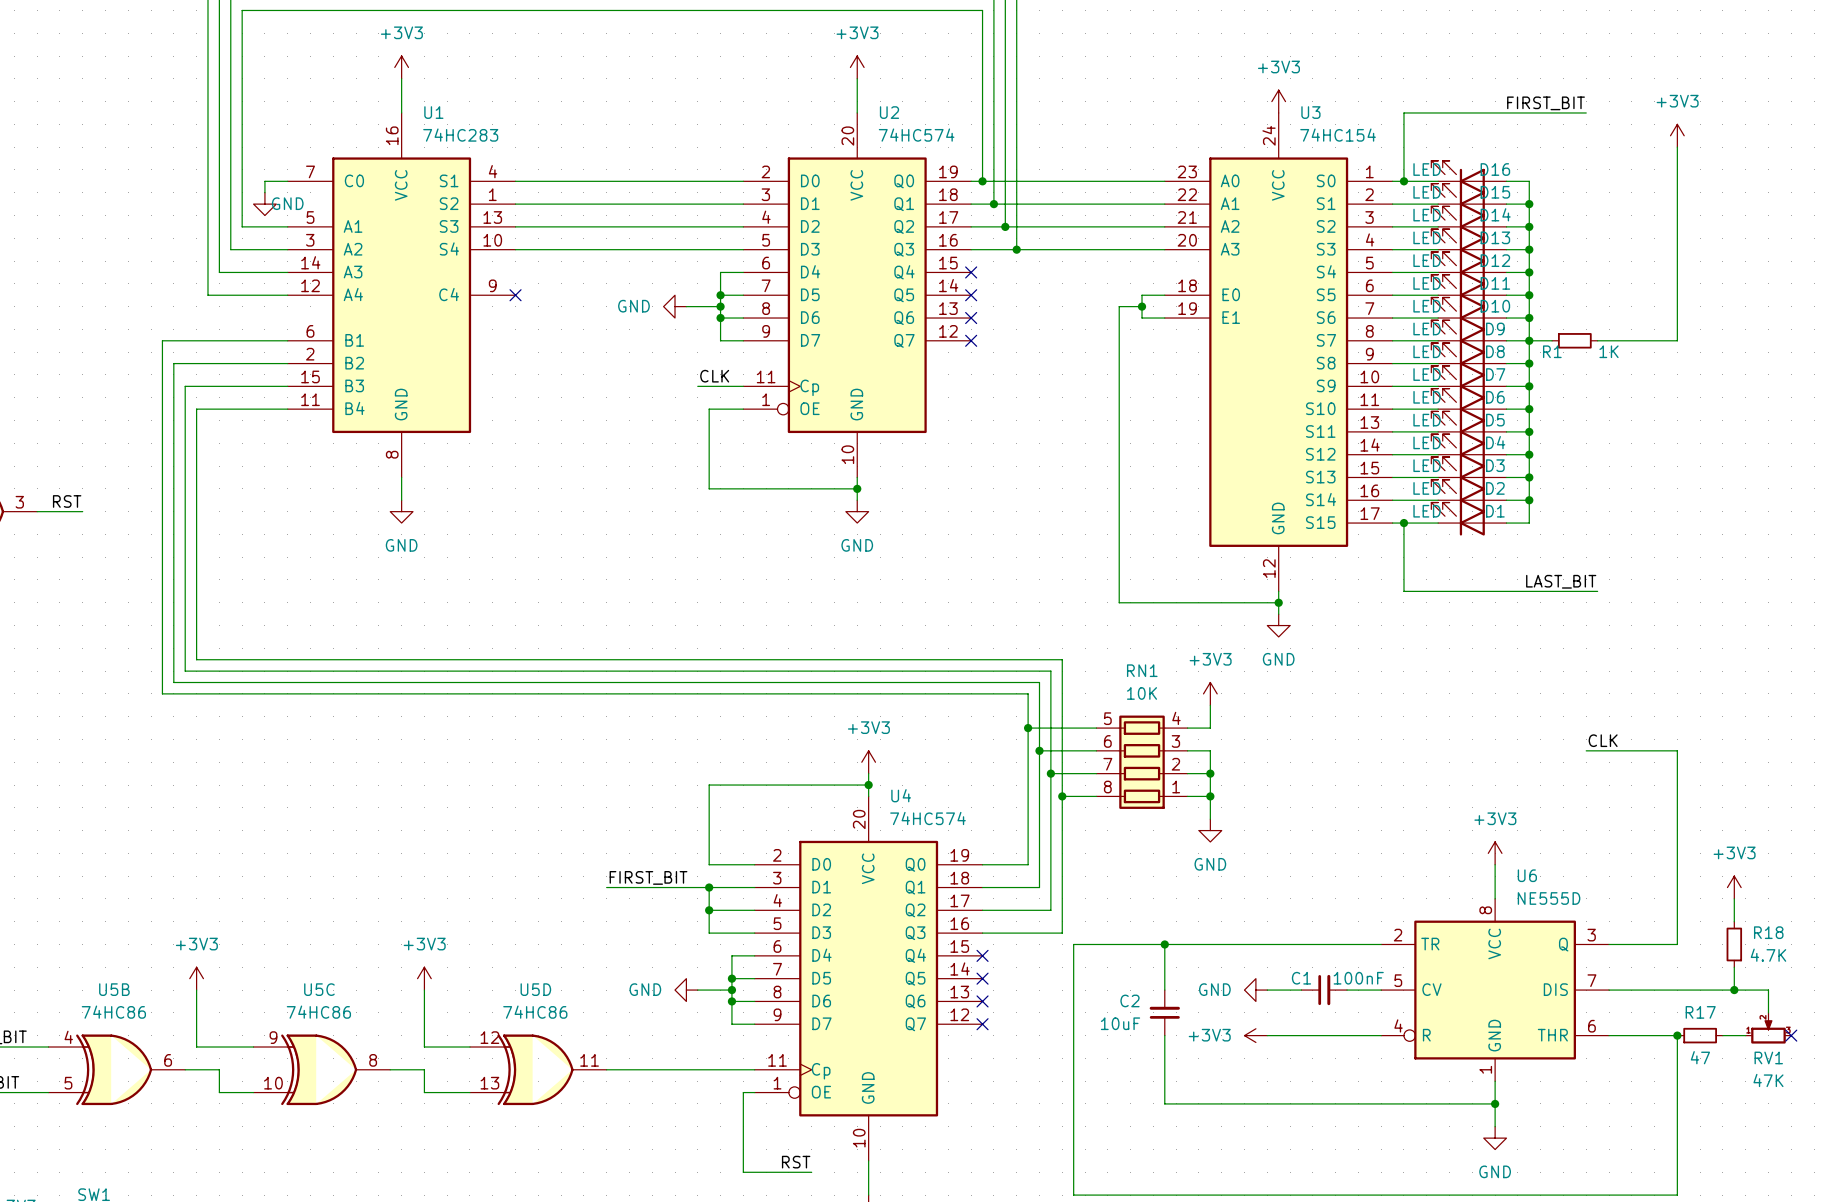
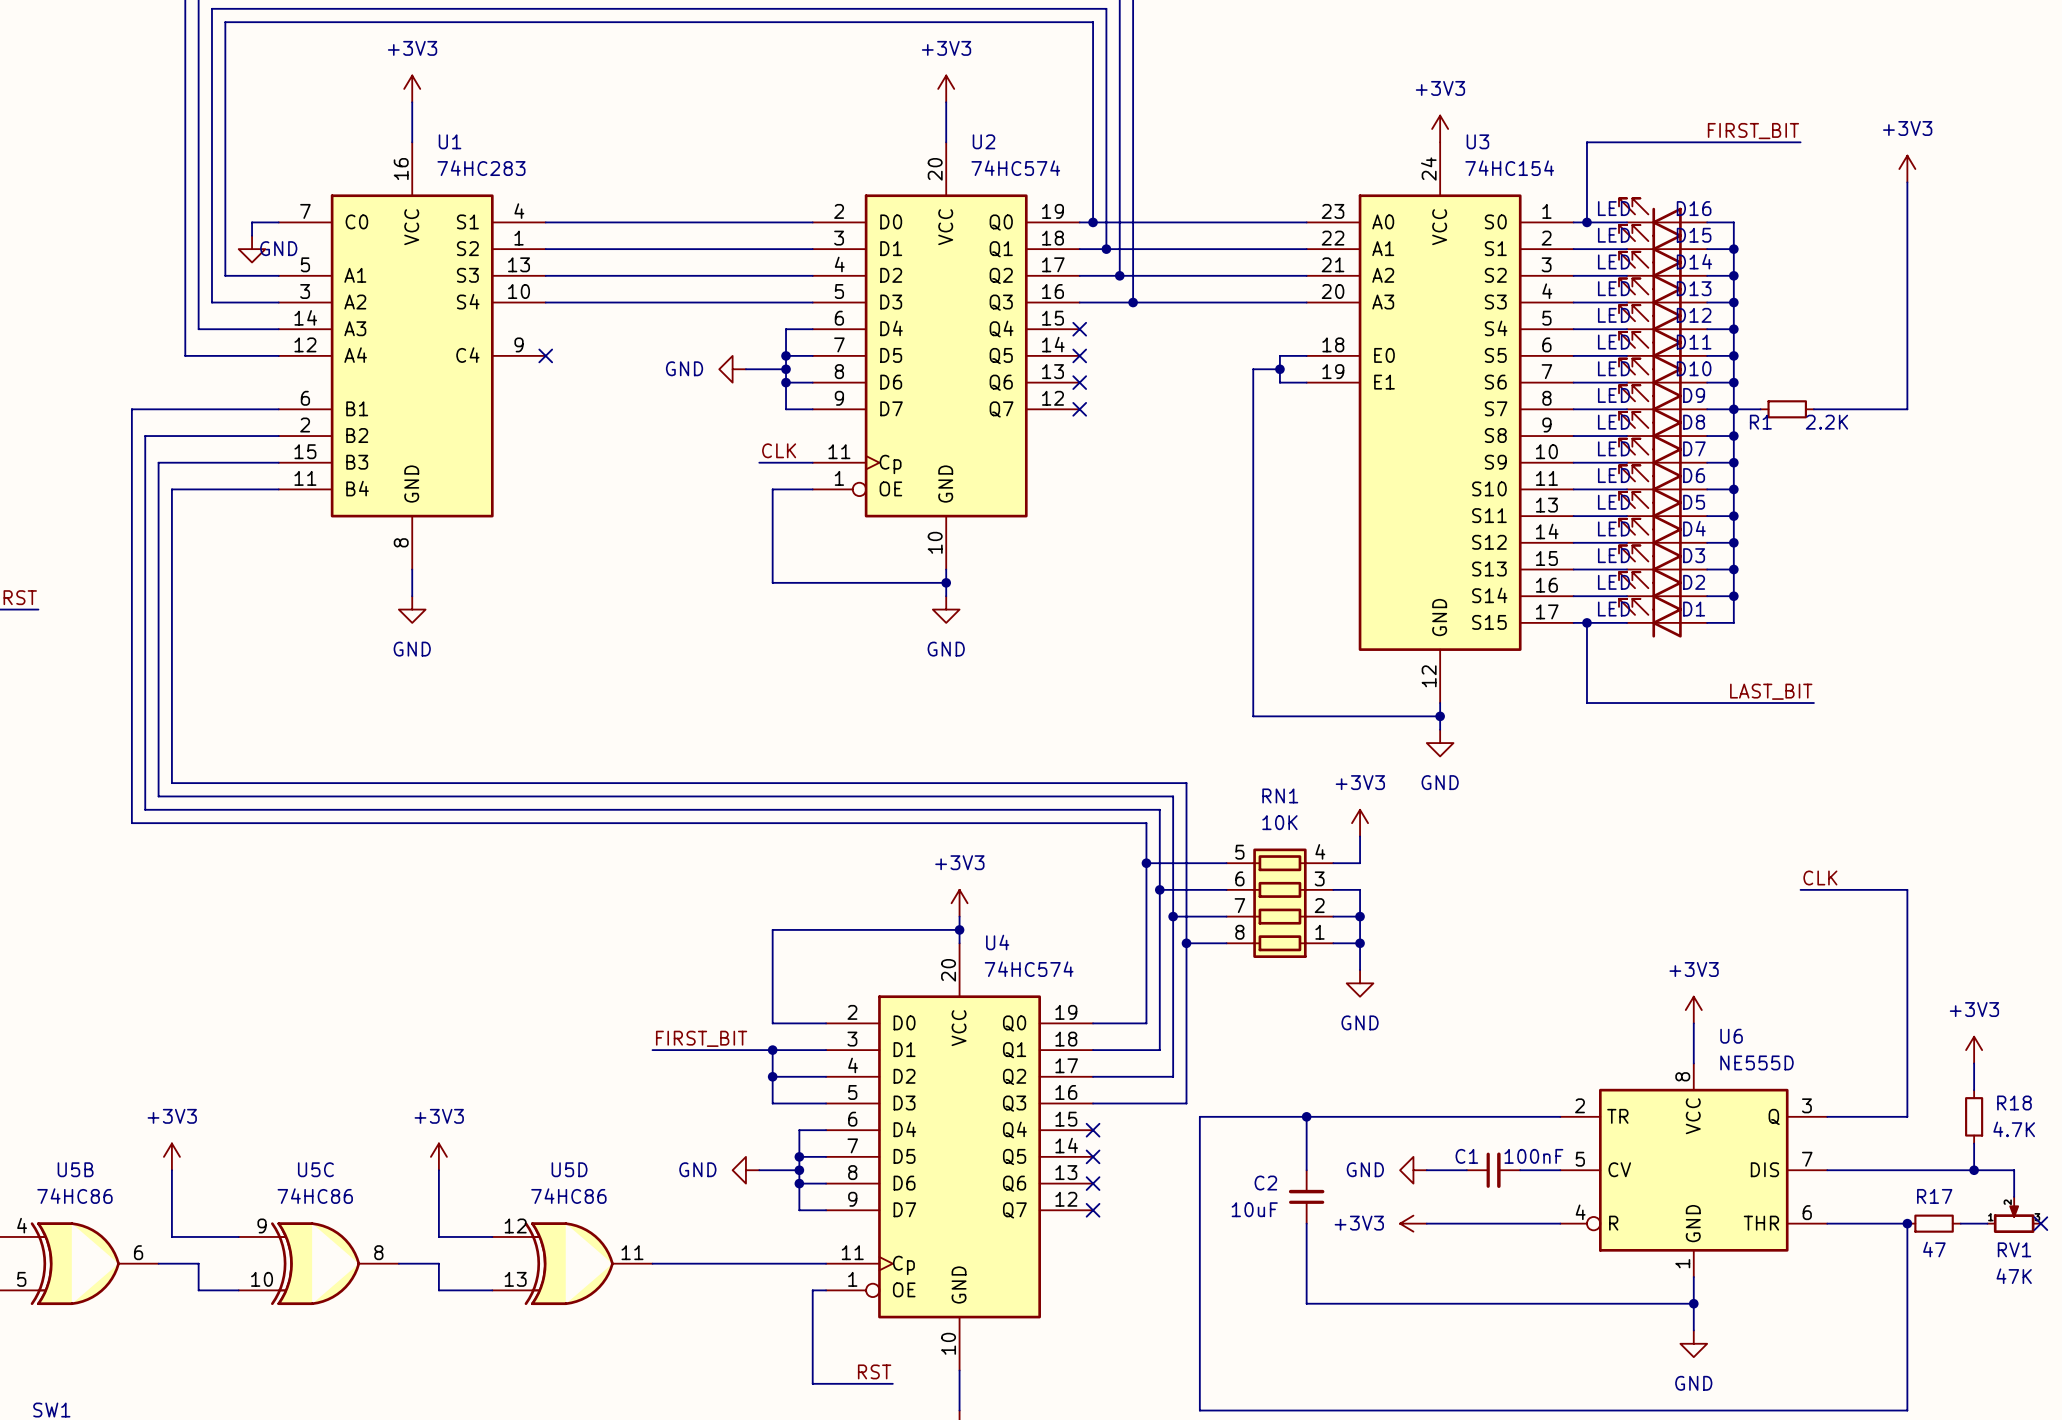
R1 value: 1K (1609, 351) -> 2.2K (1826, 422)

